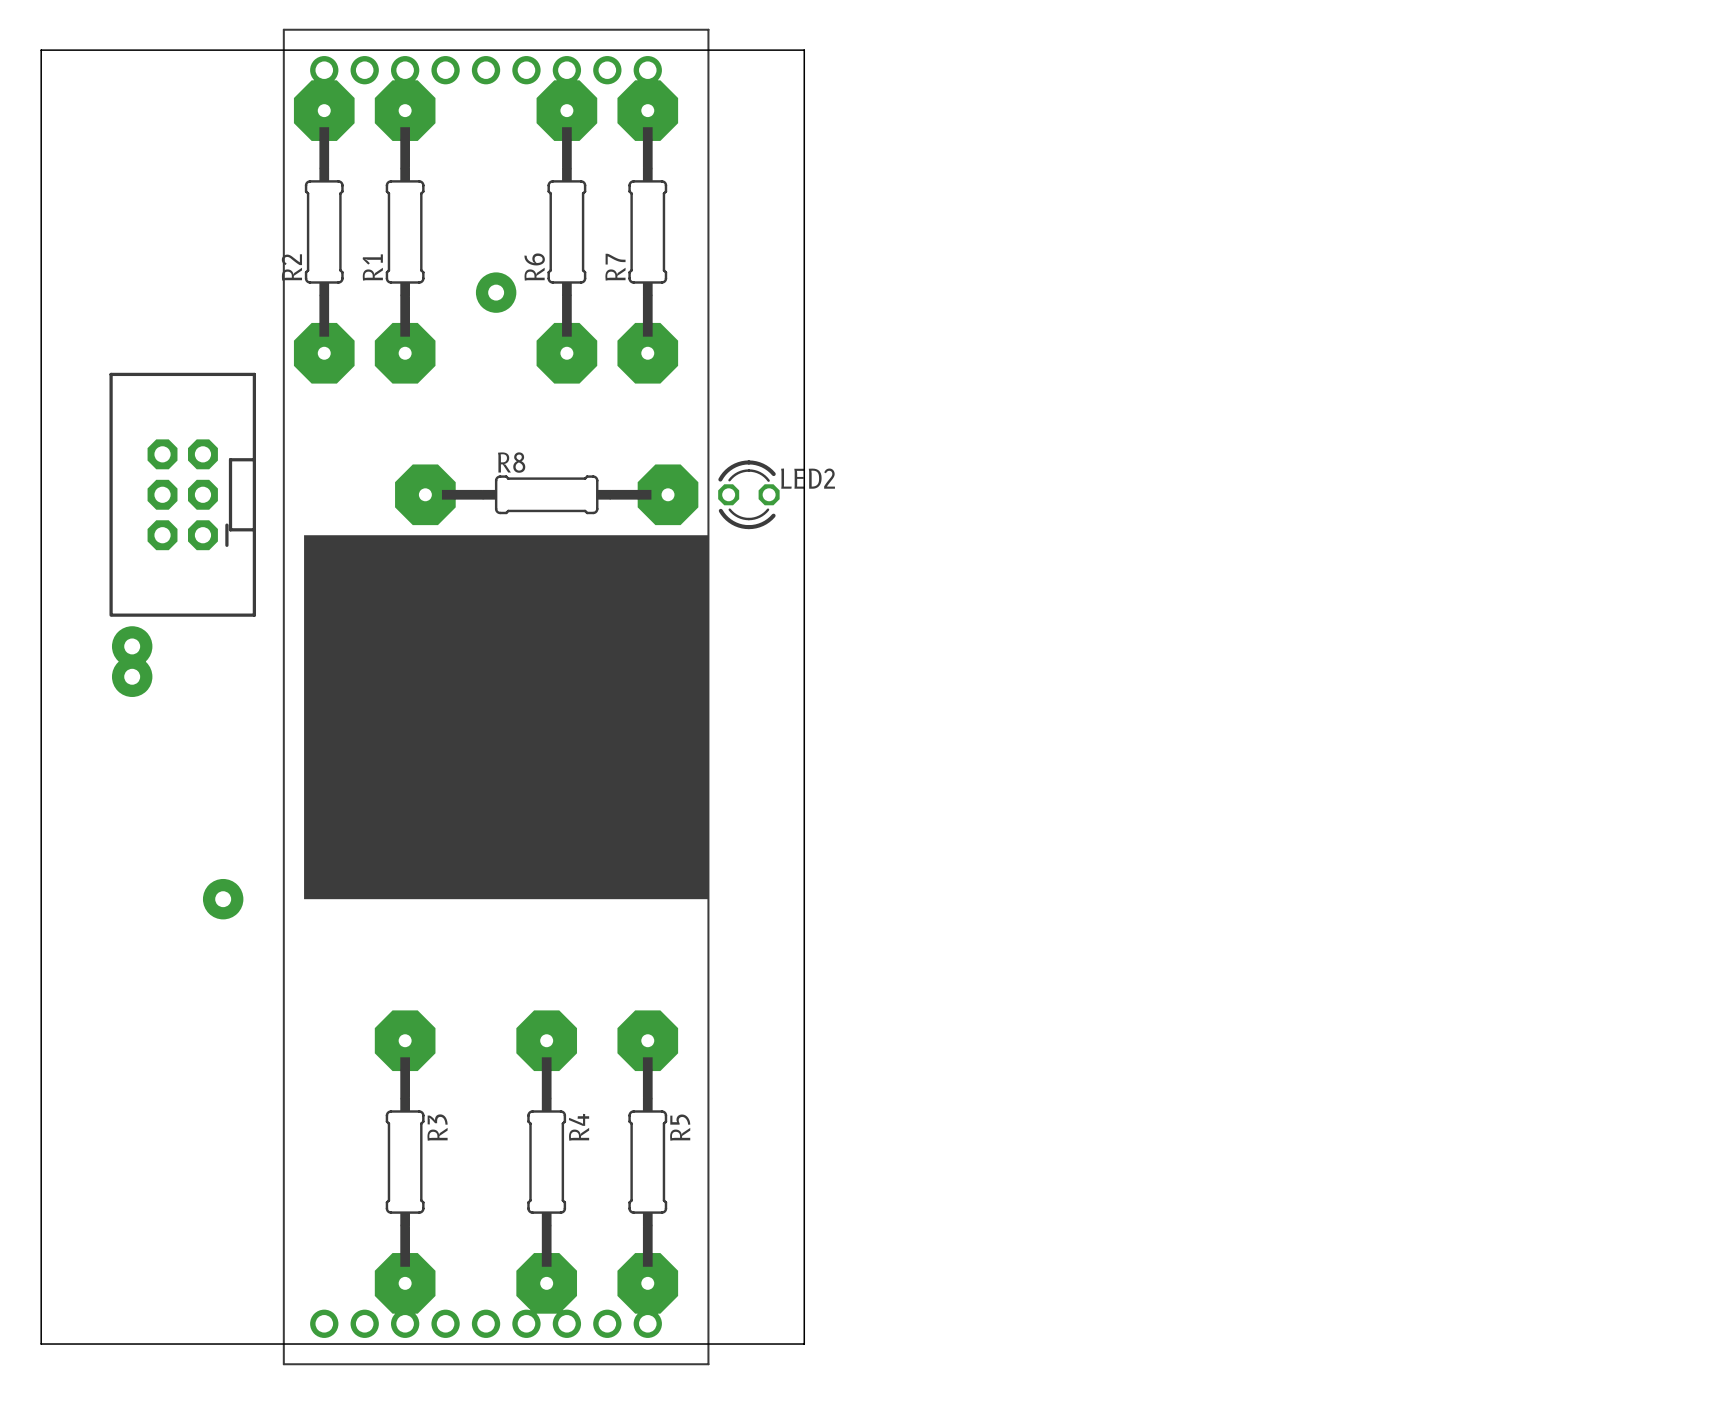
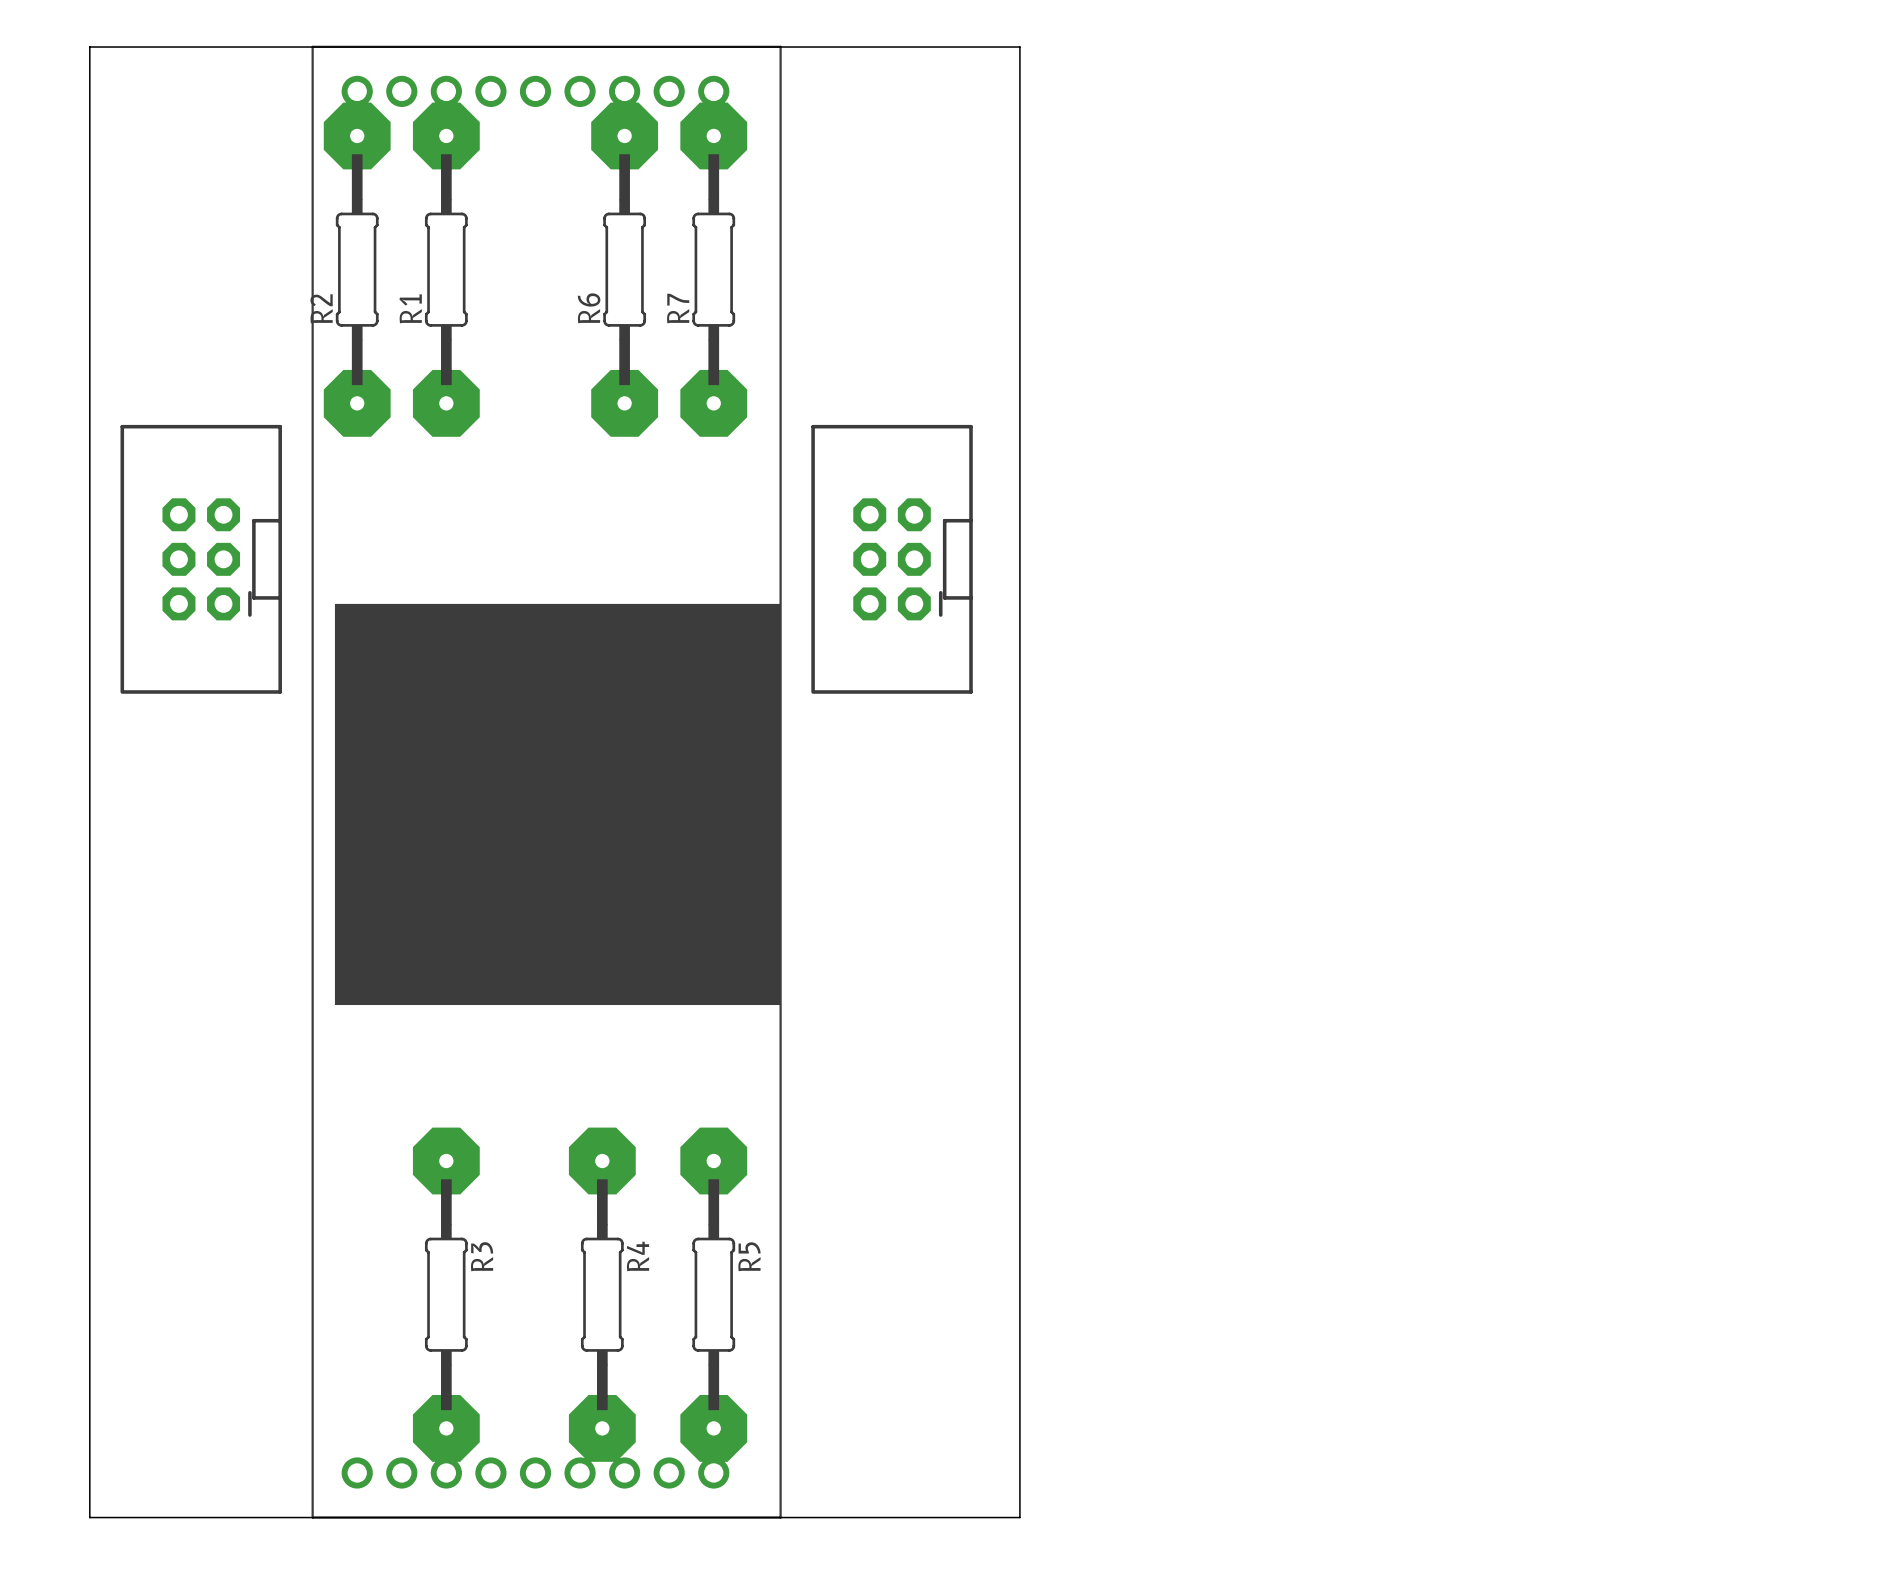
board edge: (41, 50) (804, 50) (804, 1344) (41, 1344) (41, 50) -> (89, 47) (89, 1517) (1019, 1517) (1019, 47) (89, 47)
via: (496, 292) -> none
R8: (546, 494) -> none
LED2: (748, 494) -> none
part: none -> (892, 559)
via: (132, 646) -> none
via: (132, 676) -> none
via: (223, 899) -> none

